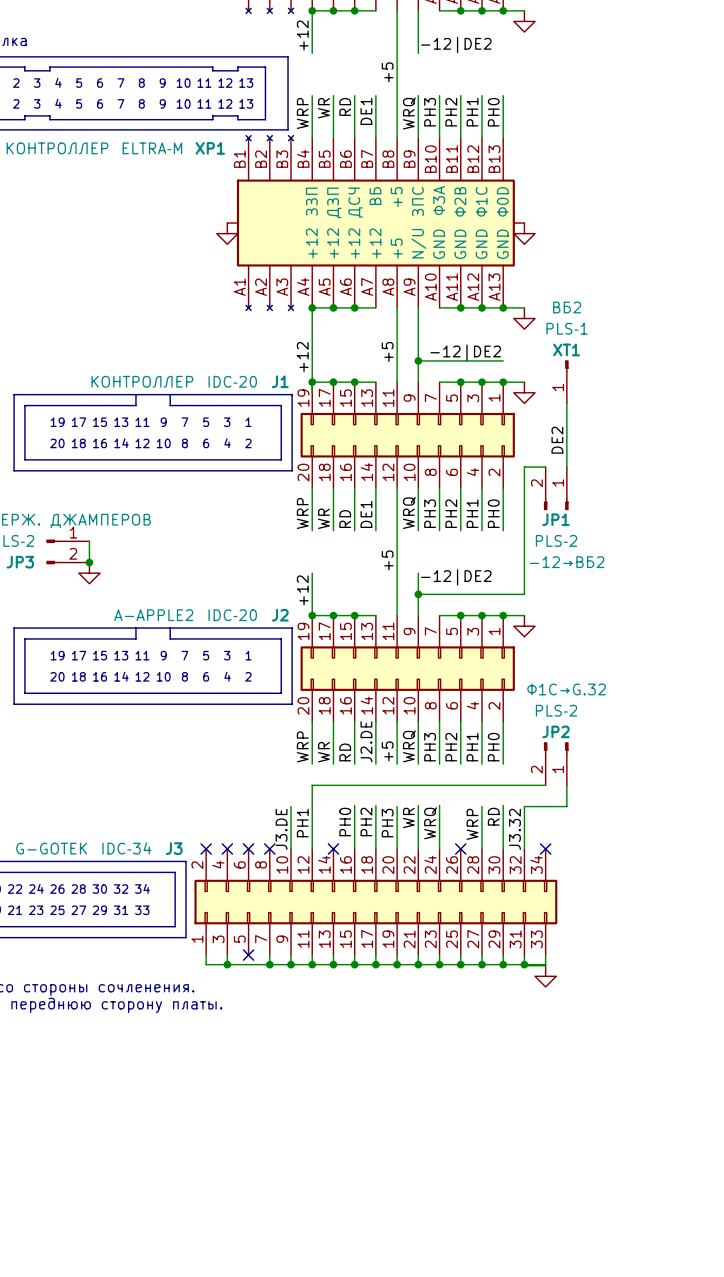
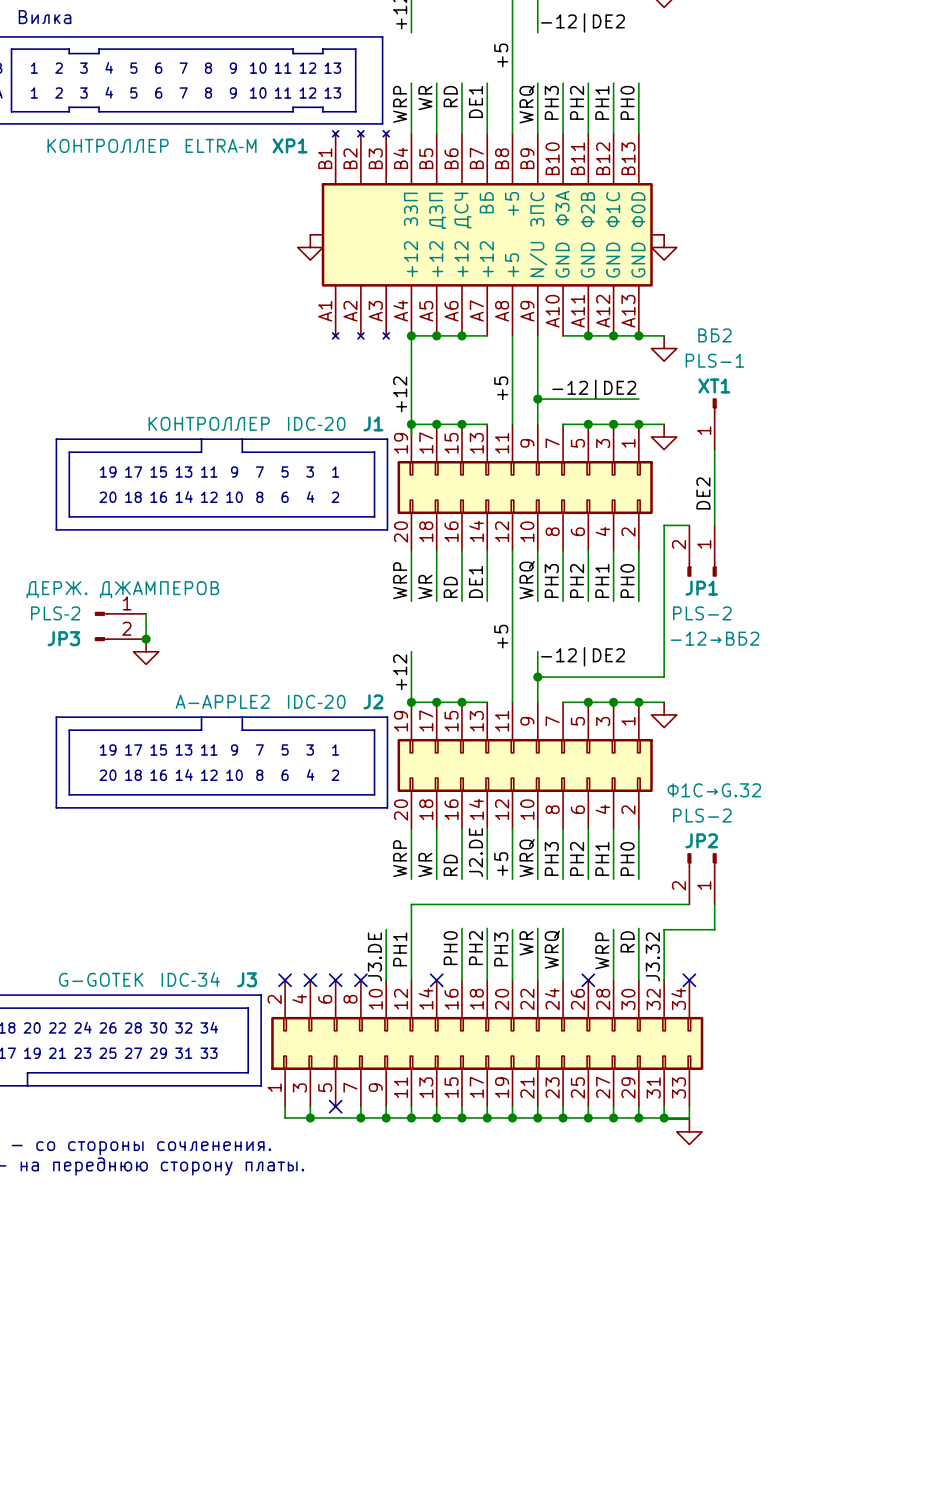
XT1 value: PLS‐1 (567, 328) -> PLS-1 (714, 360)
JP1 value: PLS‐2 (556, 540) -> PLS-2 (702, 613)
JP2 value: PLS‐2 (556, 710) -> PLS-2 (702, 815)

